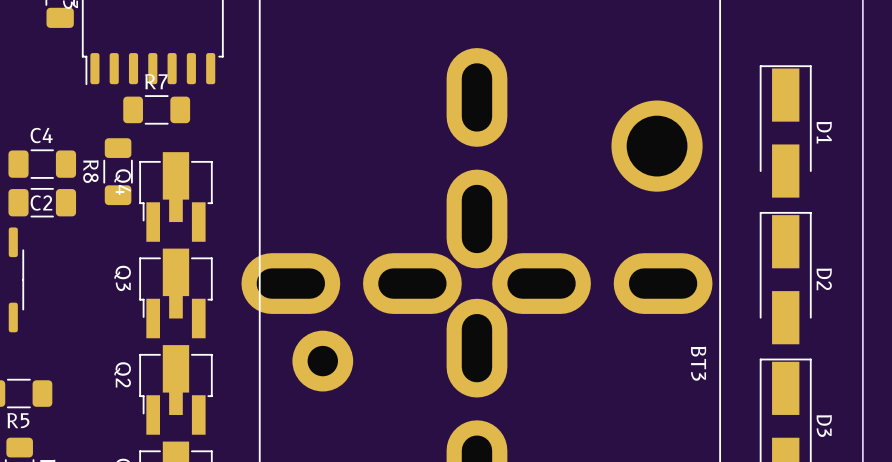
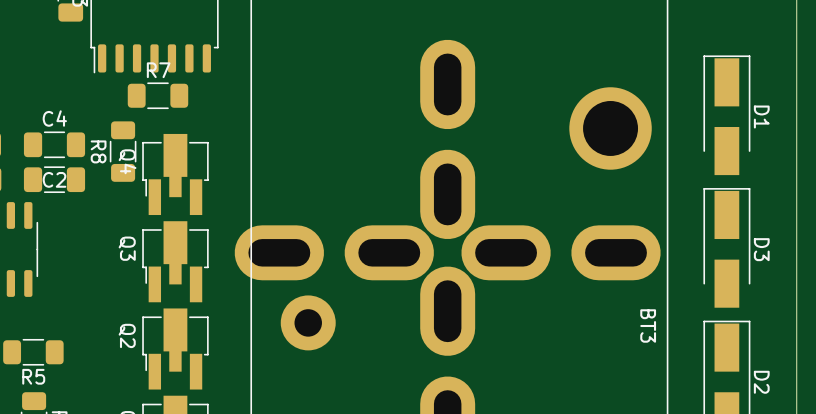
D2 name: D2 (824, 279) -> D3 (761, 249)
D3 name: D3 (824, 425) -> D2 (761, 382)

